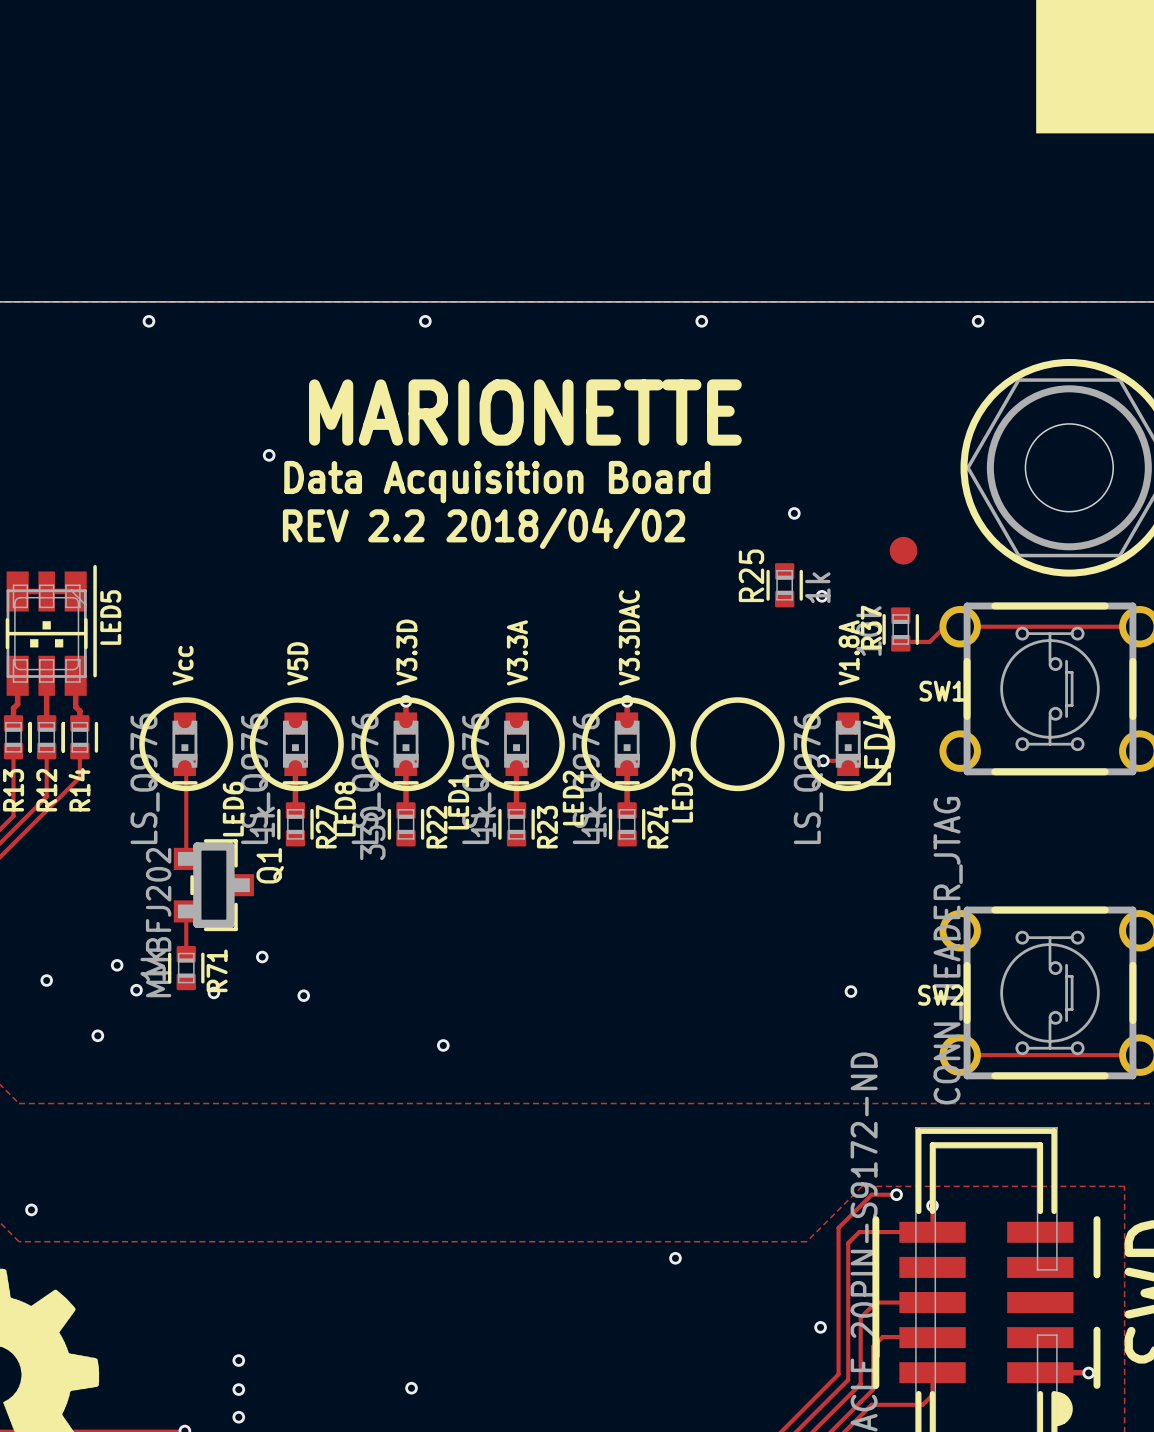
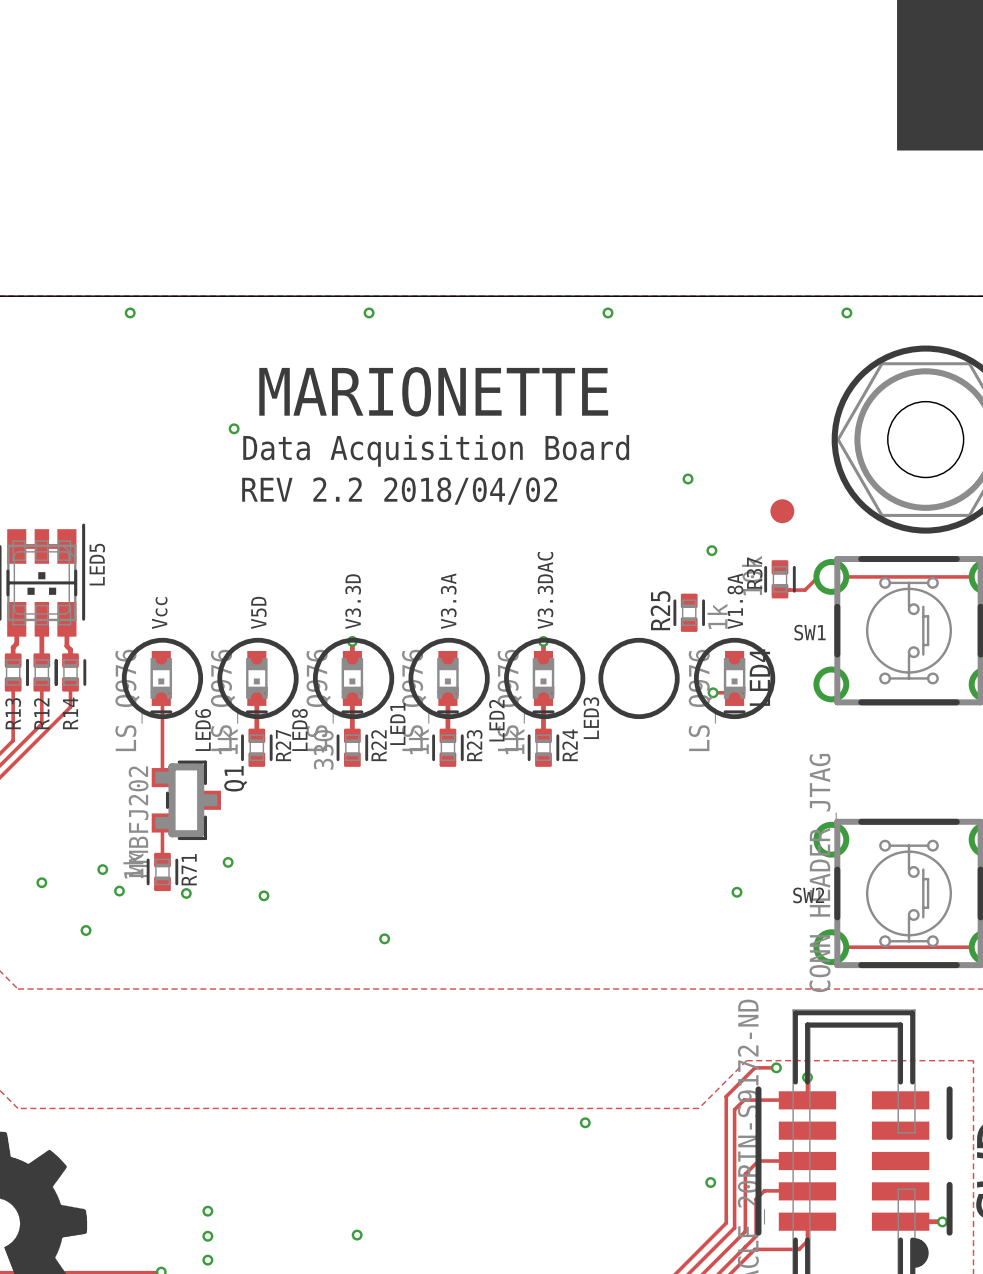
R25 position: (784, 585) -> (689, 612)
via: (31, 1209) -> none

